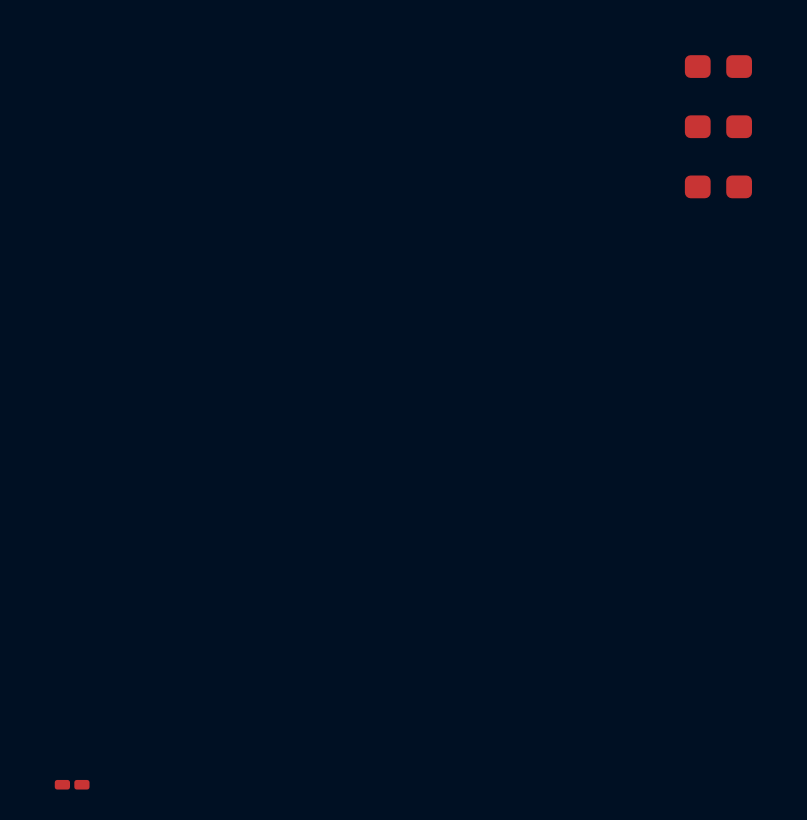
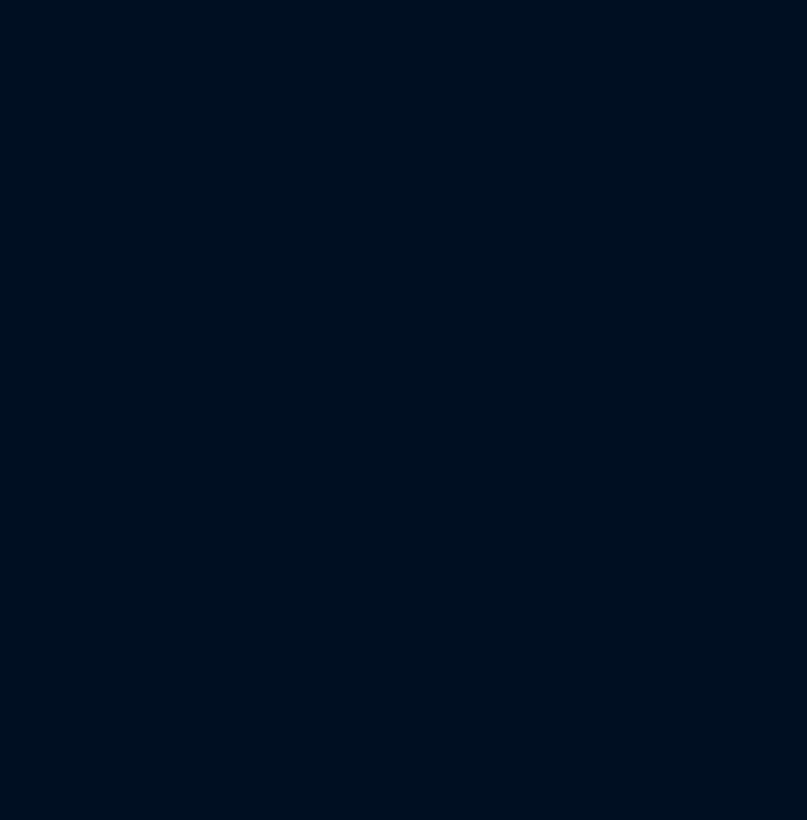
part: (718, 66) -> none
part: (718, 126) -> none
part: (718, 186) -> none
part: (72, 784) -> none

